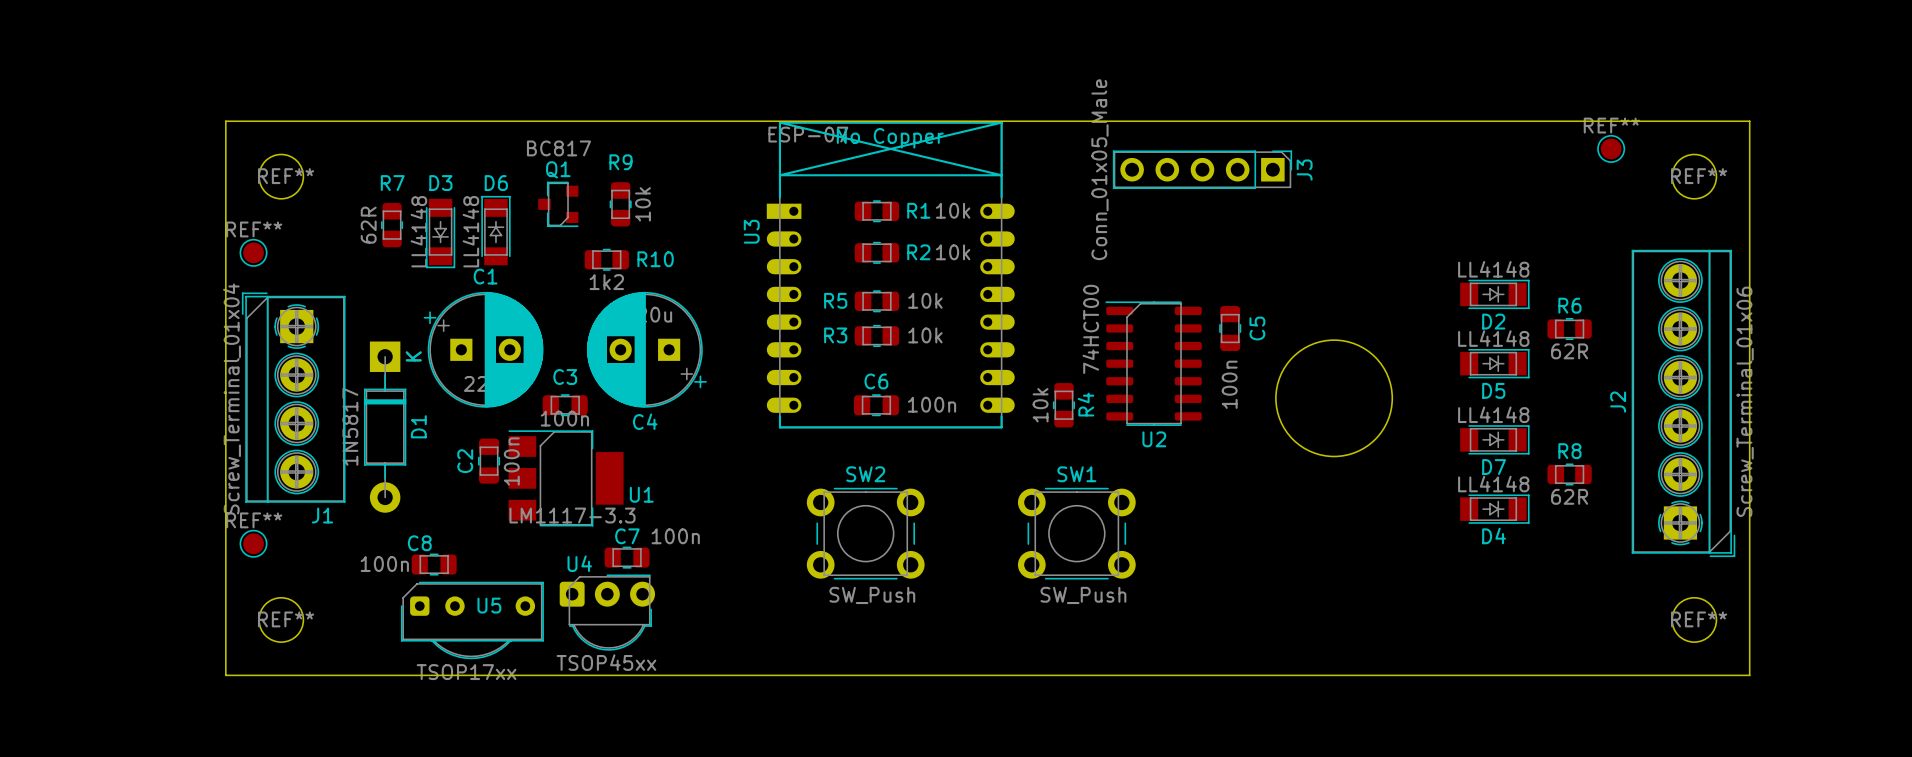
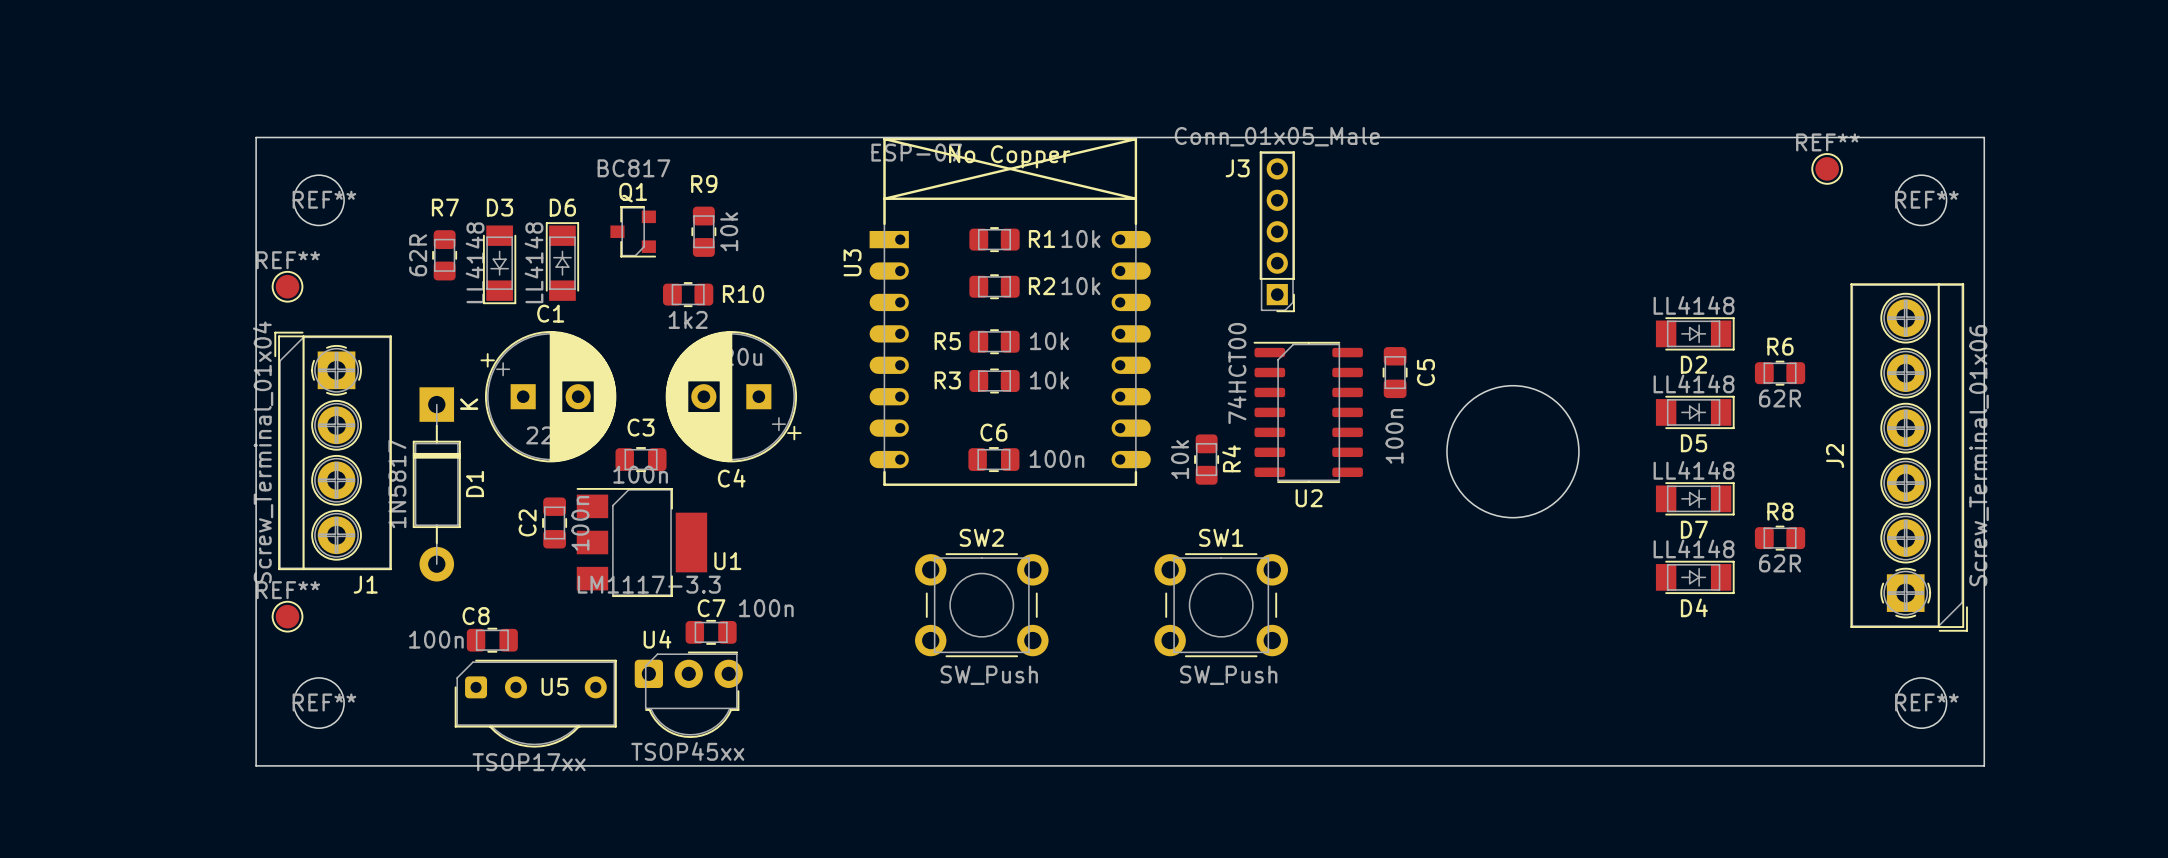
J3 footprint: [1112, 150, 1293, 189] -> [1259, 151, 1295, 313]
J3 value position: Conn_01x05_Male (1099, 169) -> Conn_01x05_Male (1277, 136)
J3 name position: J3 (1304, 170) -> J3 (1237, 168)

